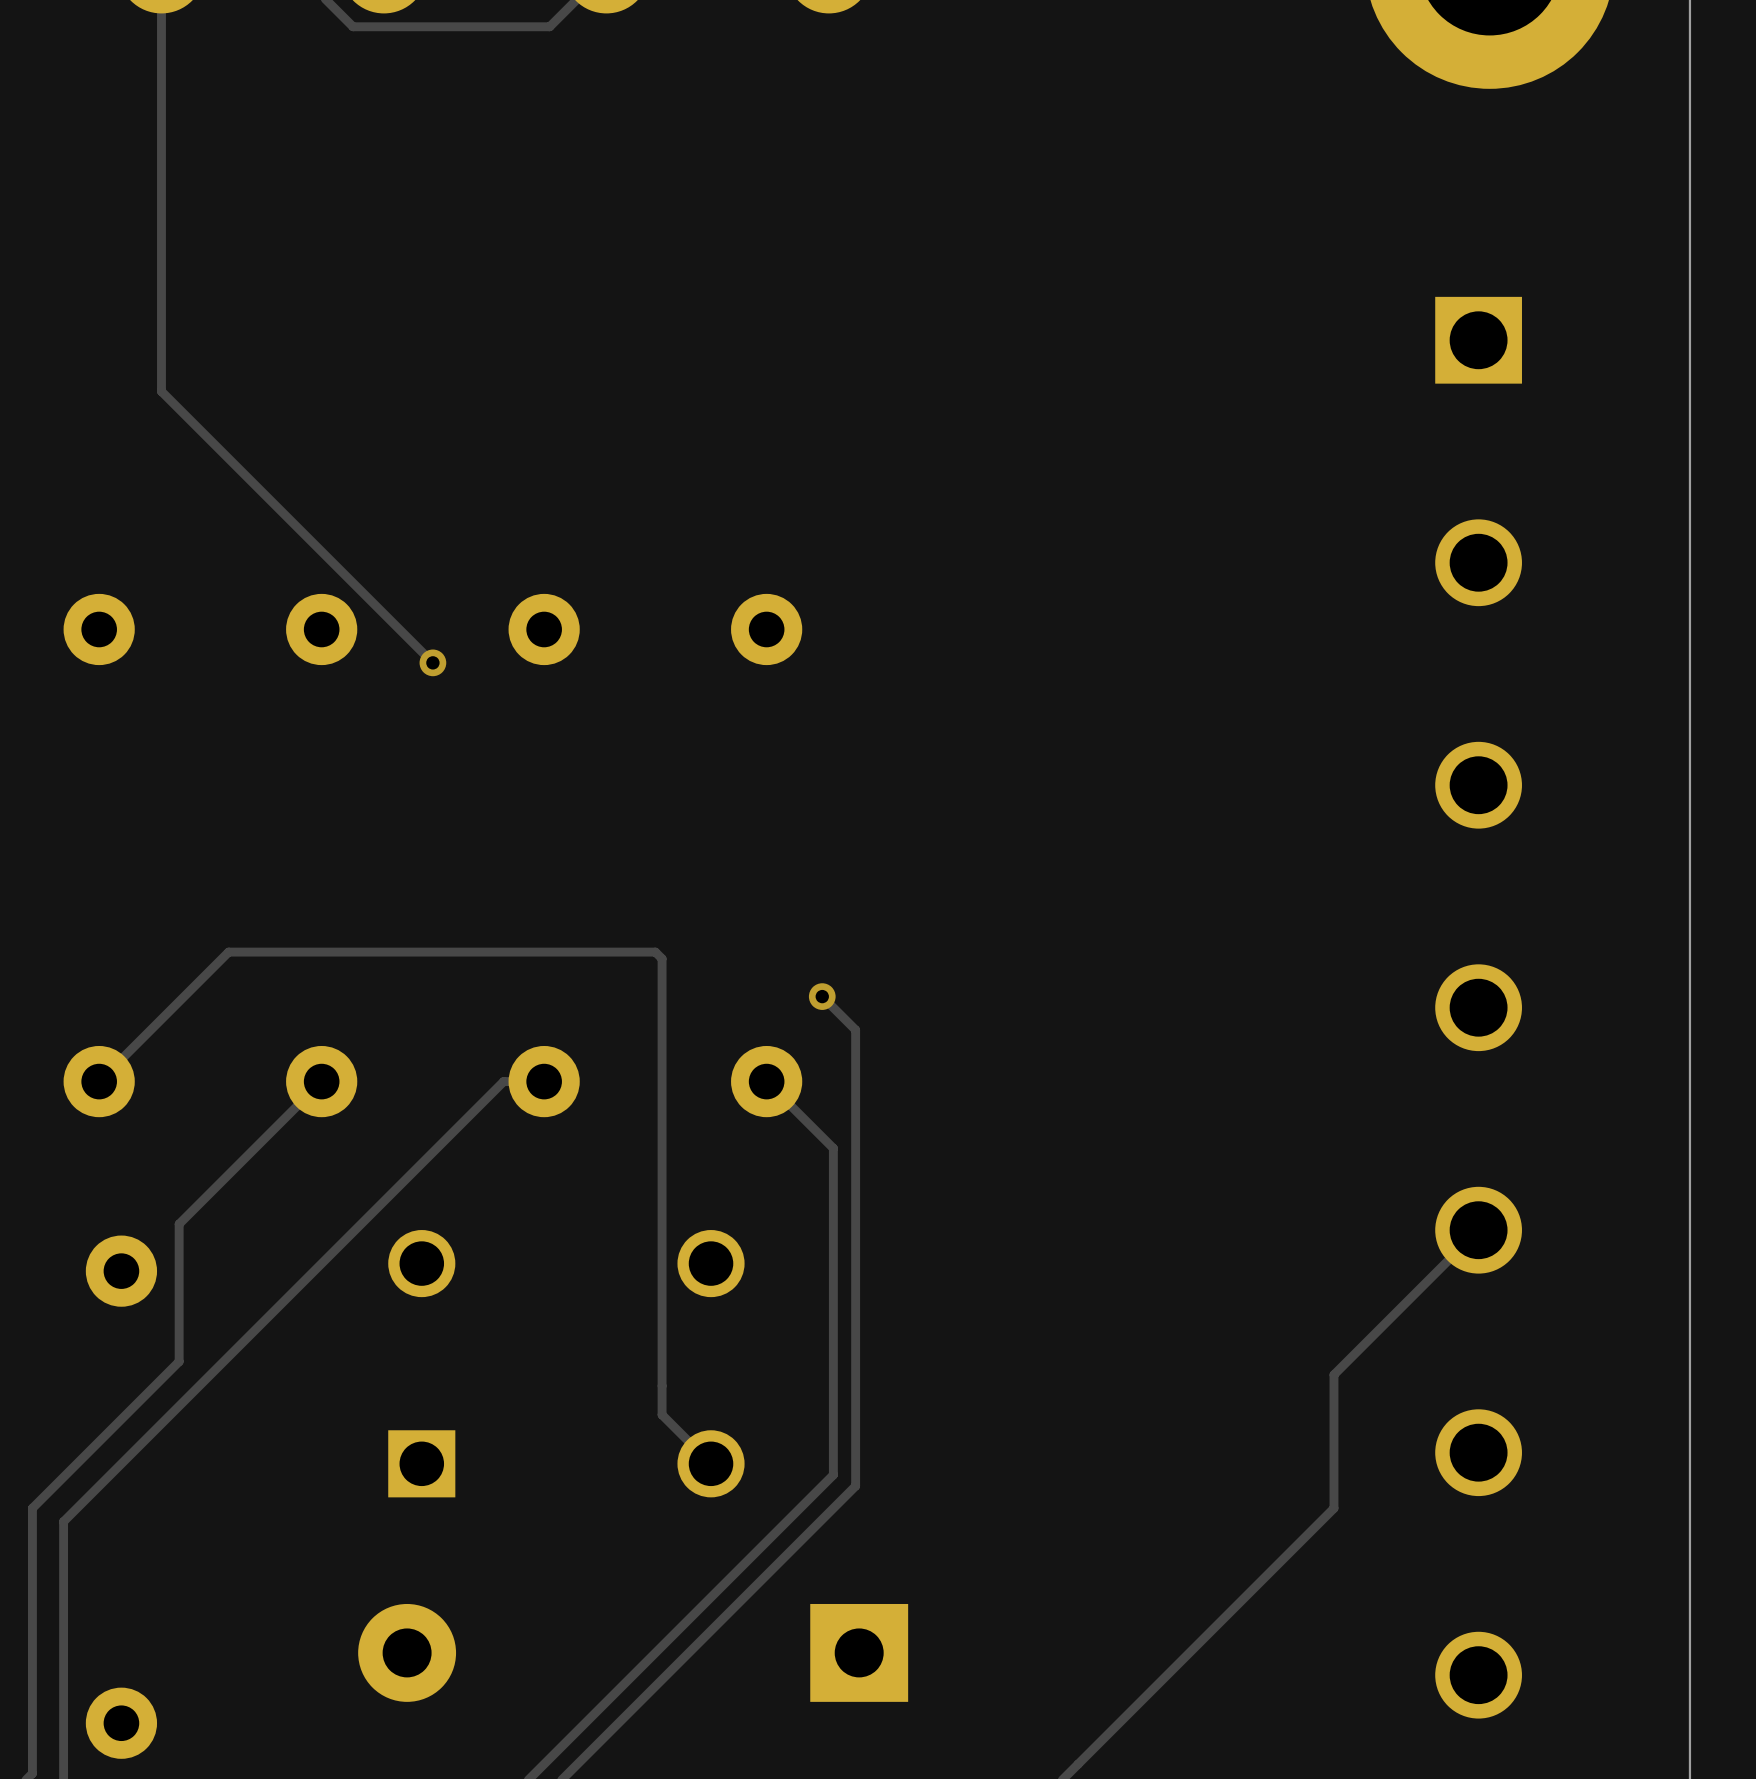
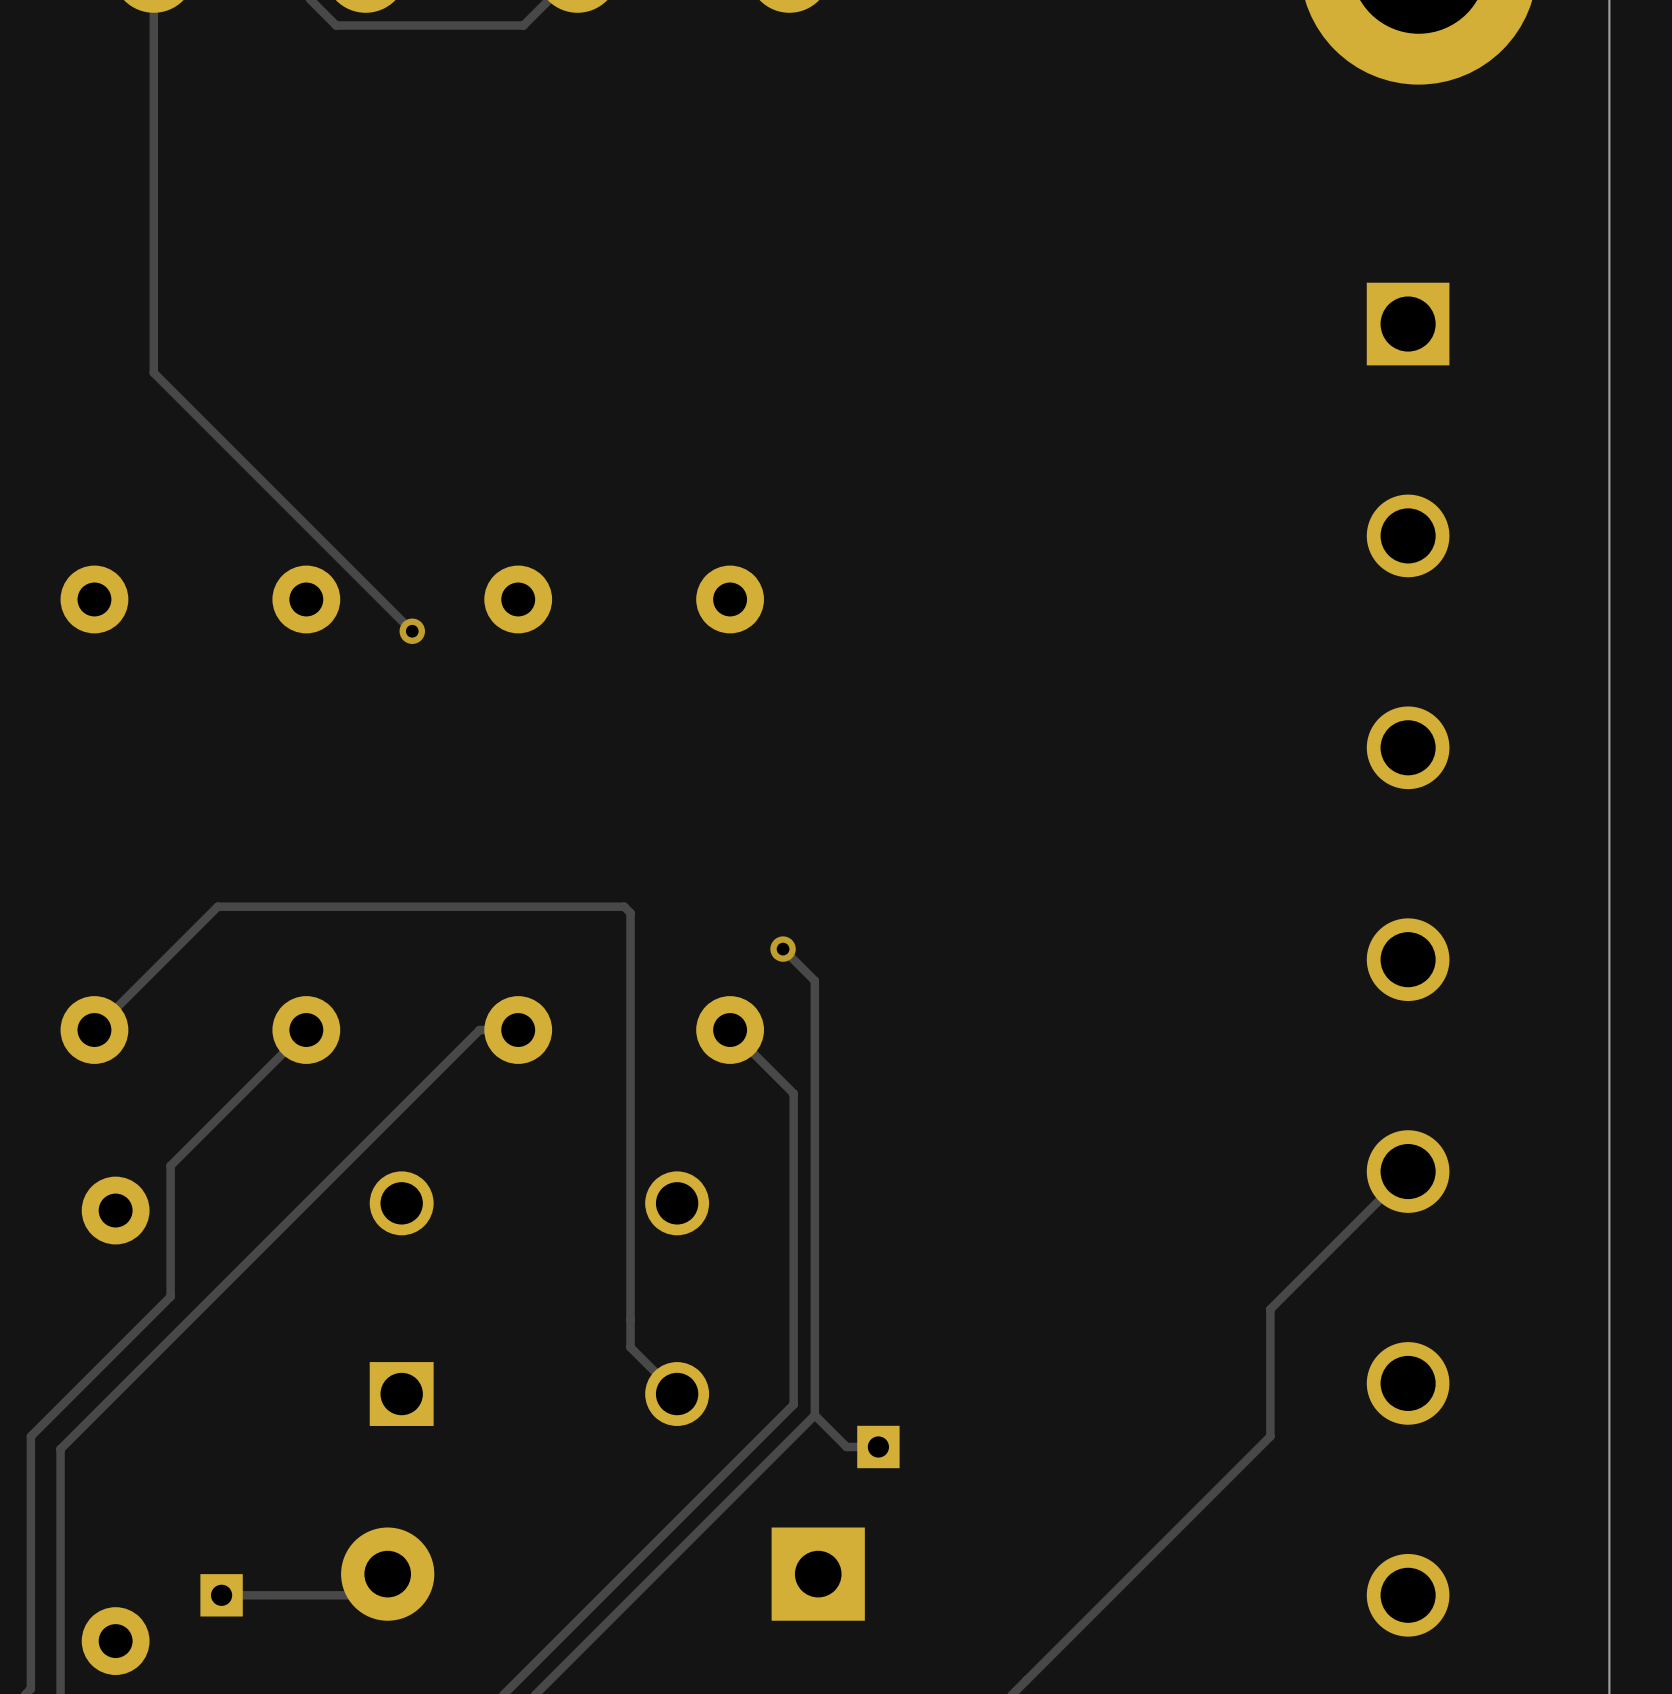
track: none -> (814, 1415) (846, 1446) (878, 1446)
part: none -> (878, 1446)
track: none -> (387, 1574) (366, 1595) (221, 1595)
part: none -> (221, 1595)

